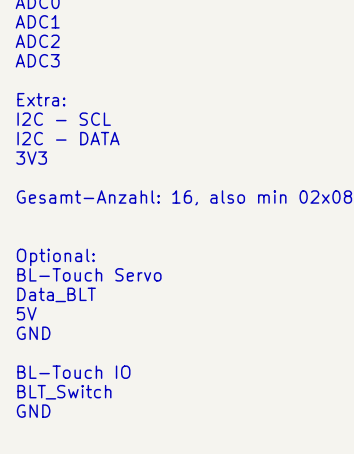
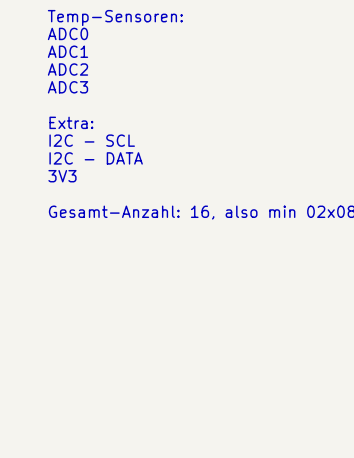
text: Optional: (55, 257) -> none
text: BL-Touch Servo (89, 274) -> none
text: Data_BLT (56, 294) -> none
text: 5V (26, 313) -> none
text: GND (33, 333) -> none
text: BL-Touch IO (73, 372) -> none
text: BLT_Switch (64, 392) -> none
text: GND (33, 411) -> none

